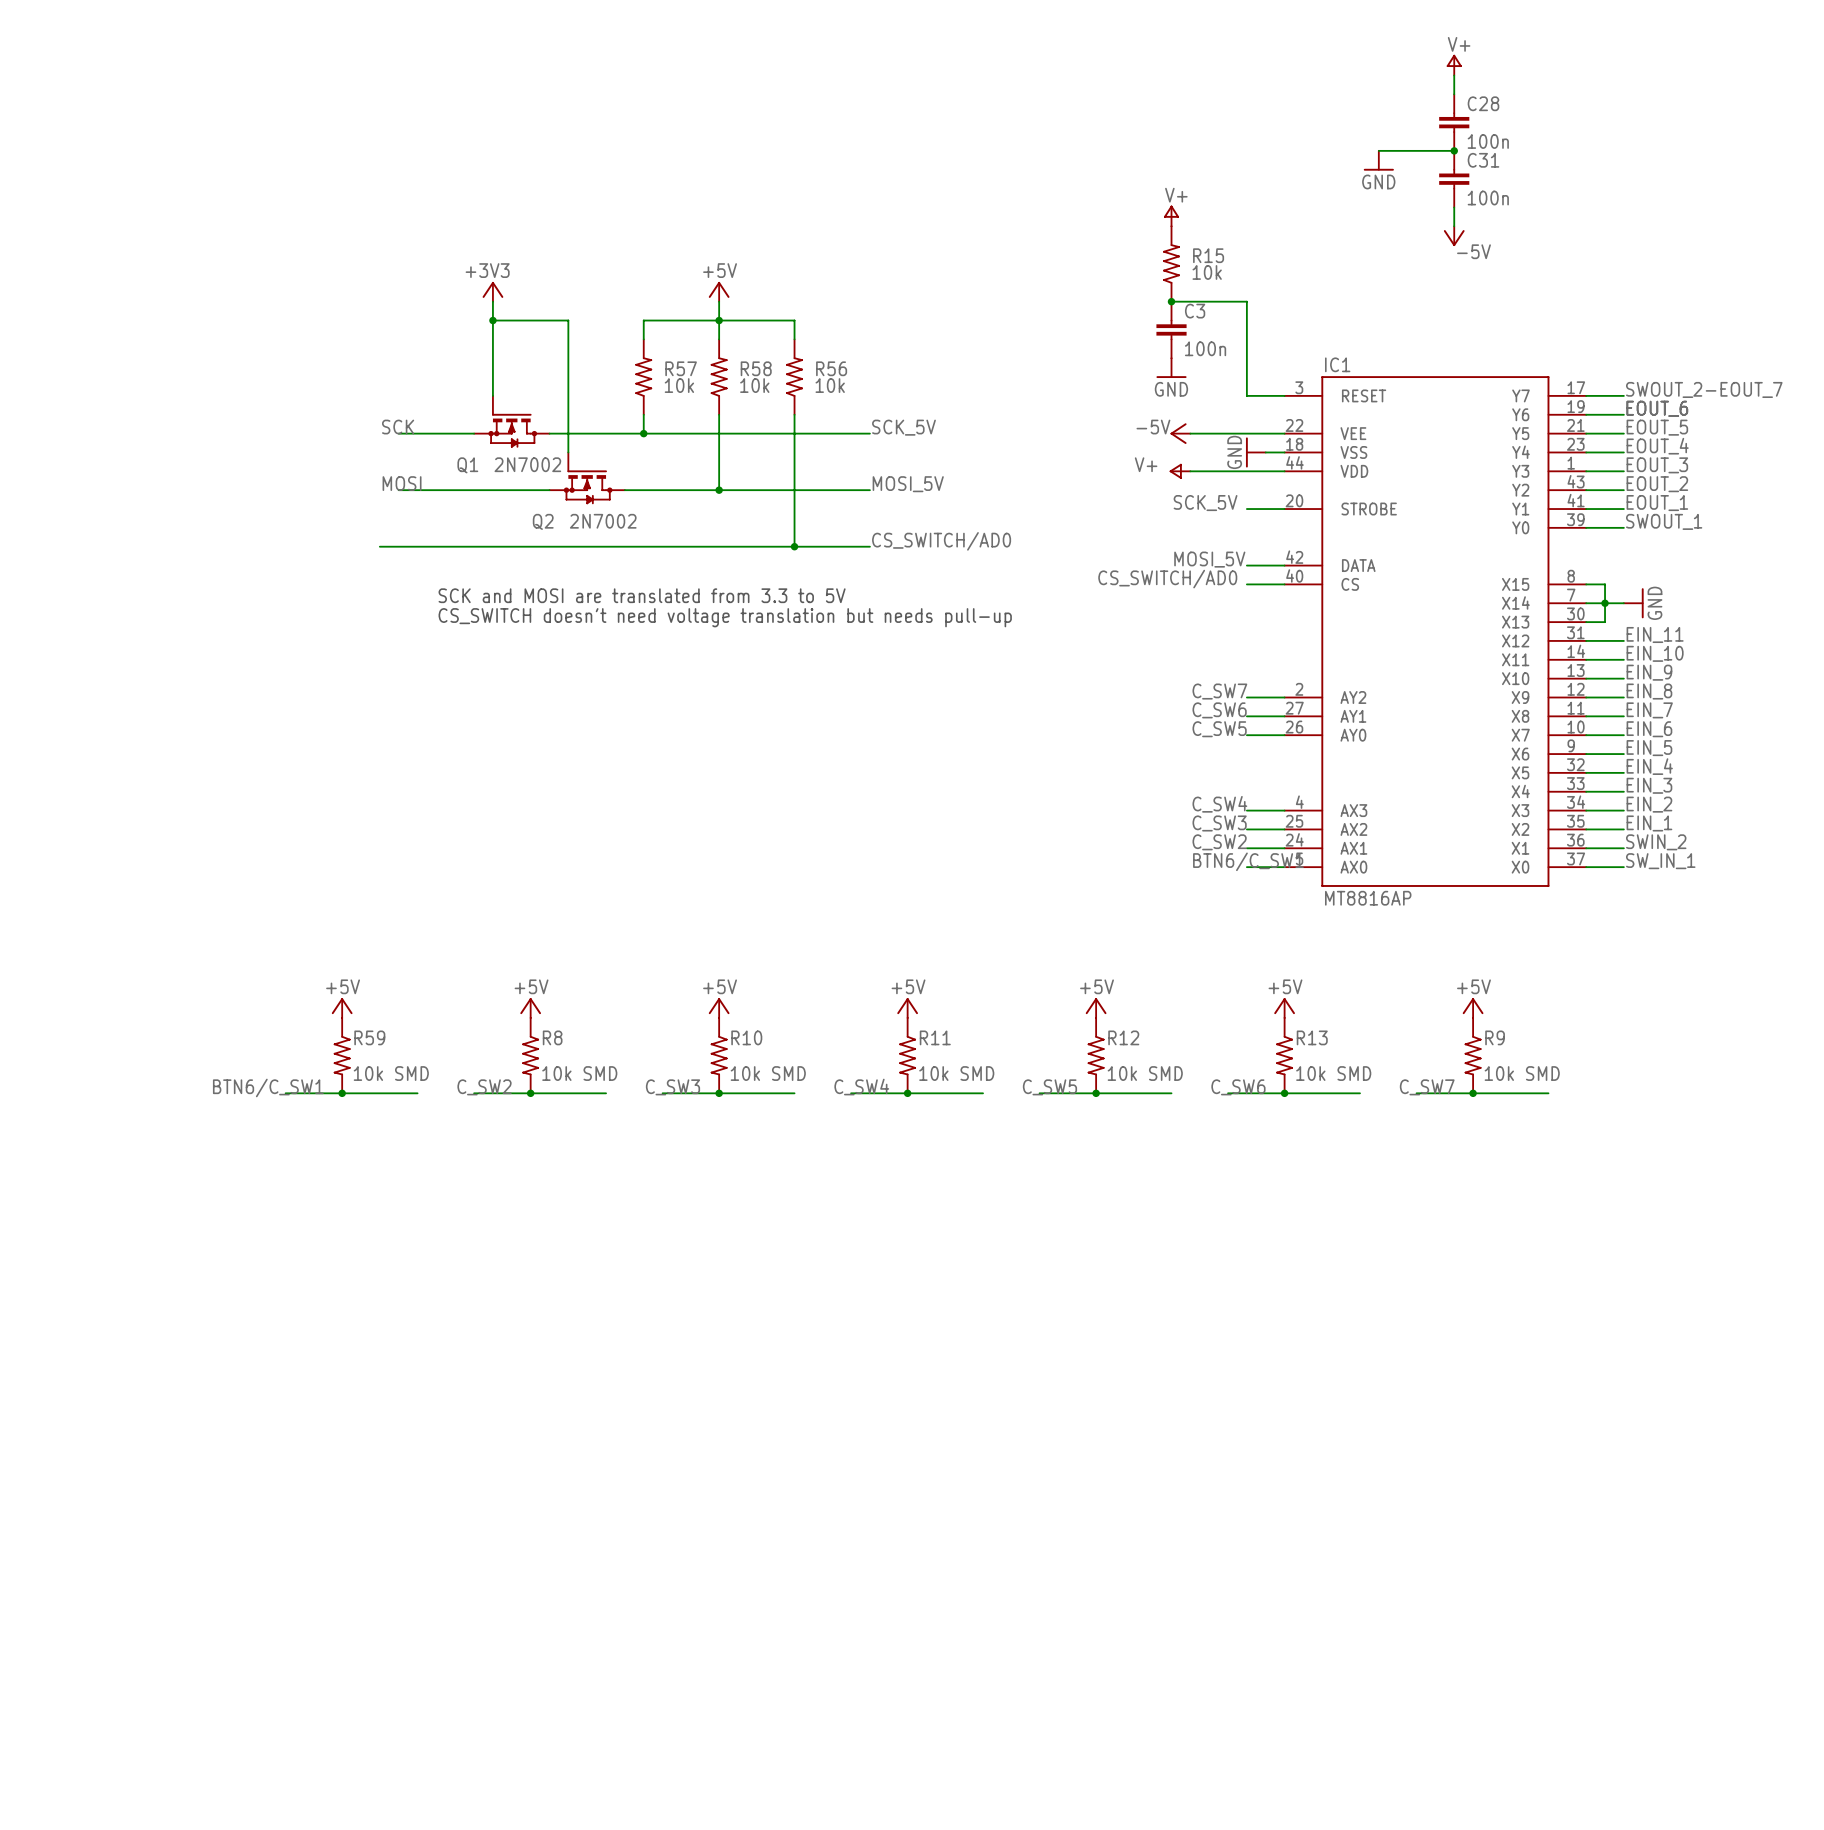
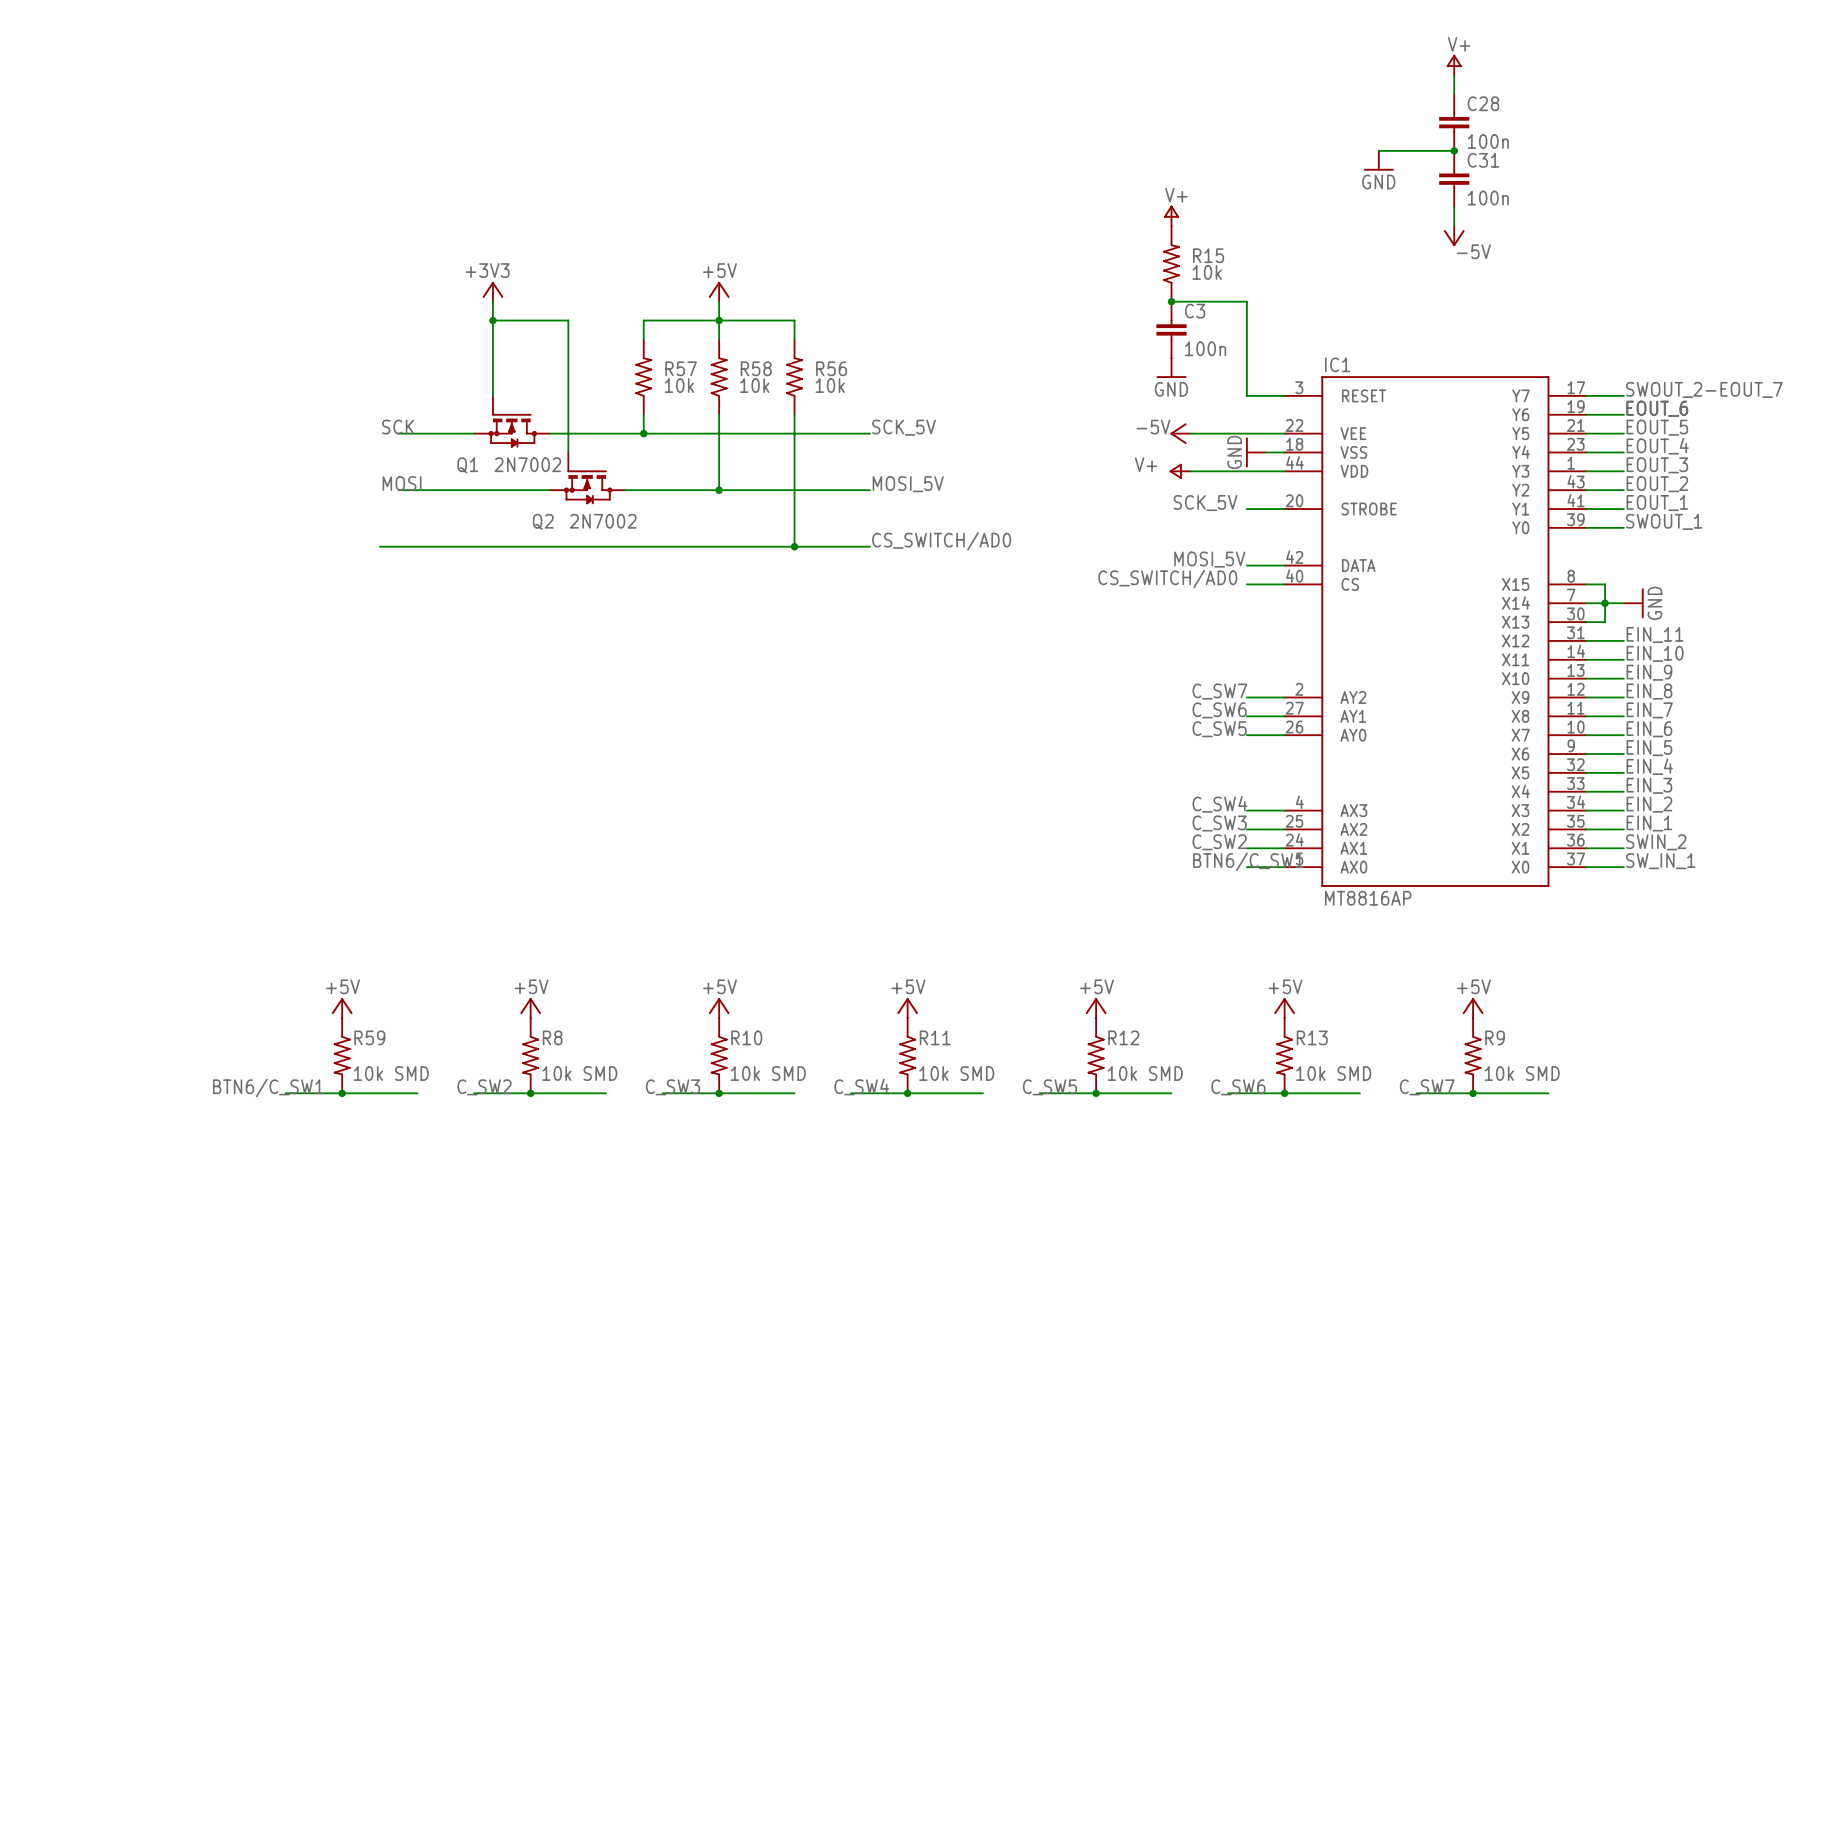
text: SCK and MOSI are translated from 3.3 to 5V (642, 595) -> none
text: CS_SWITCH doesn't need voltage translation but needs pull-up (725, 617) -> none

